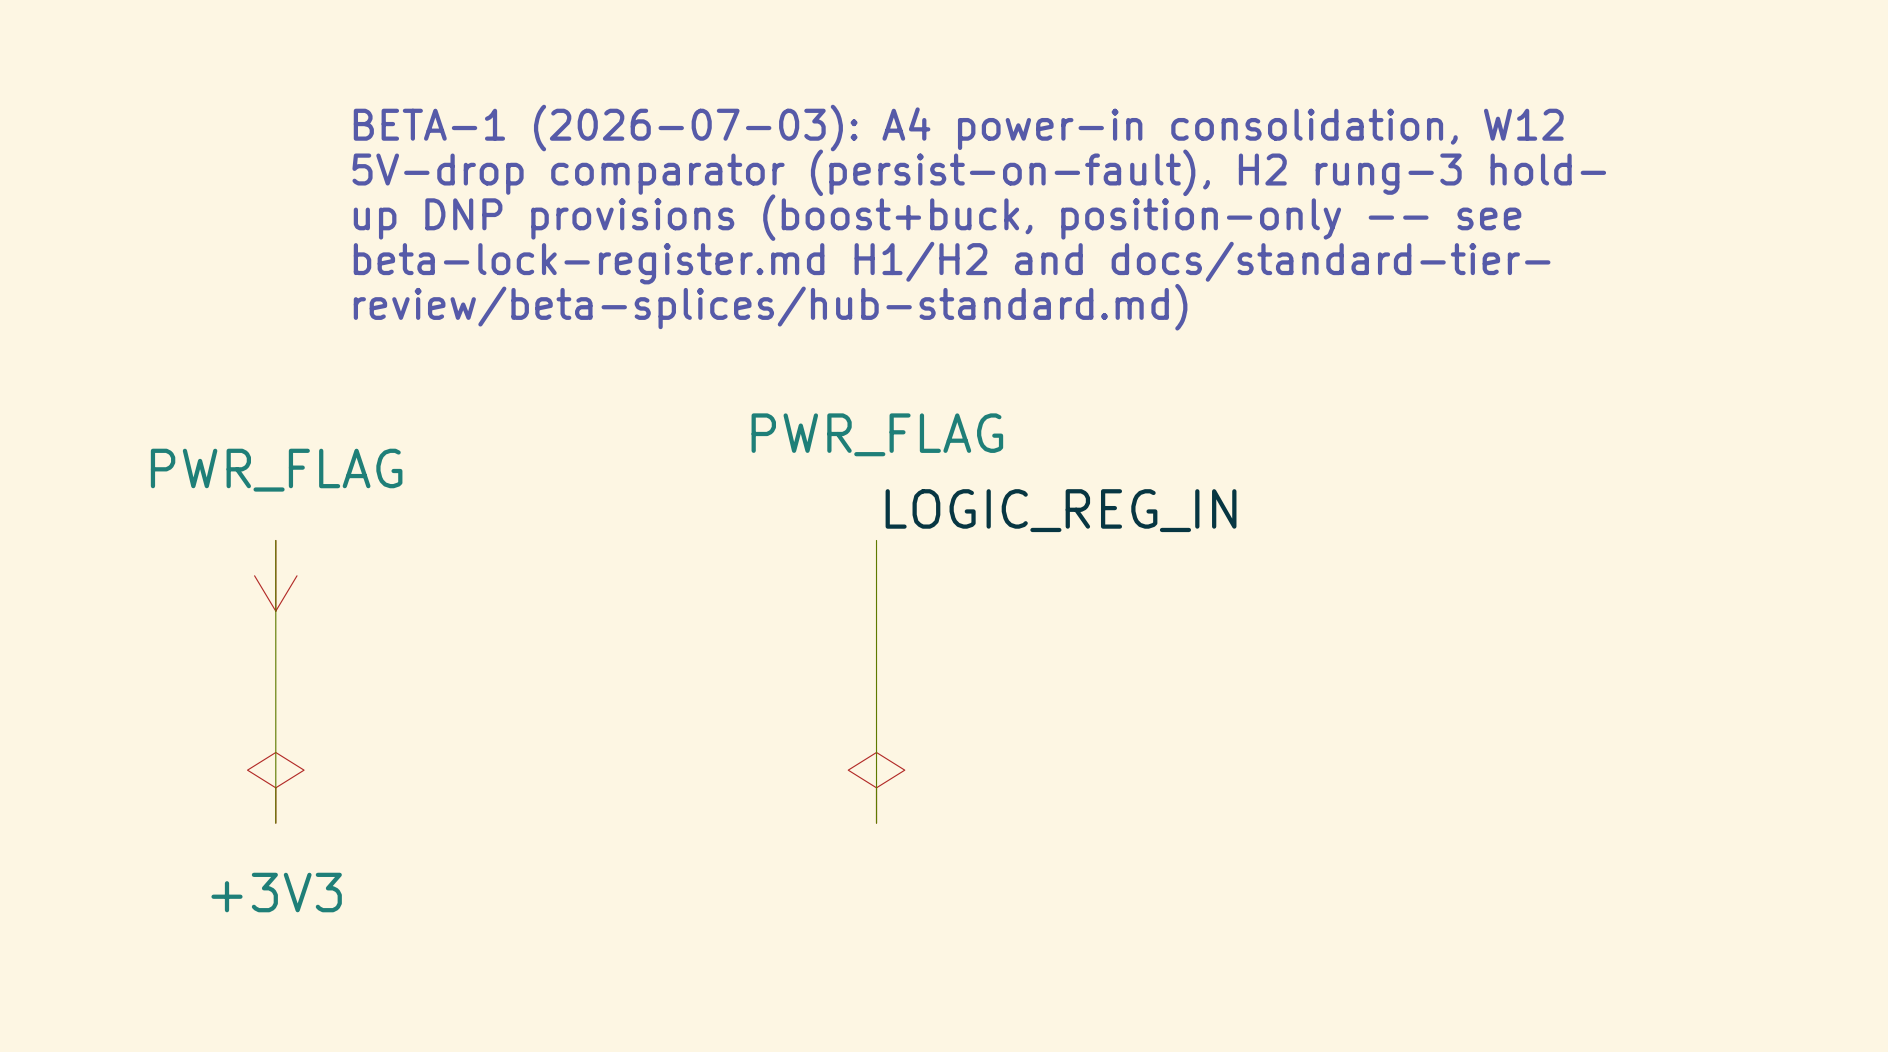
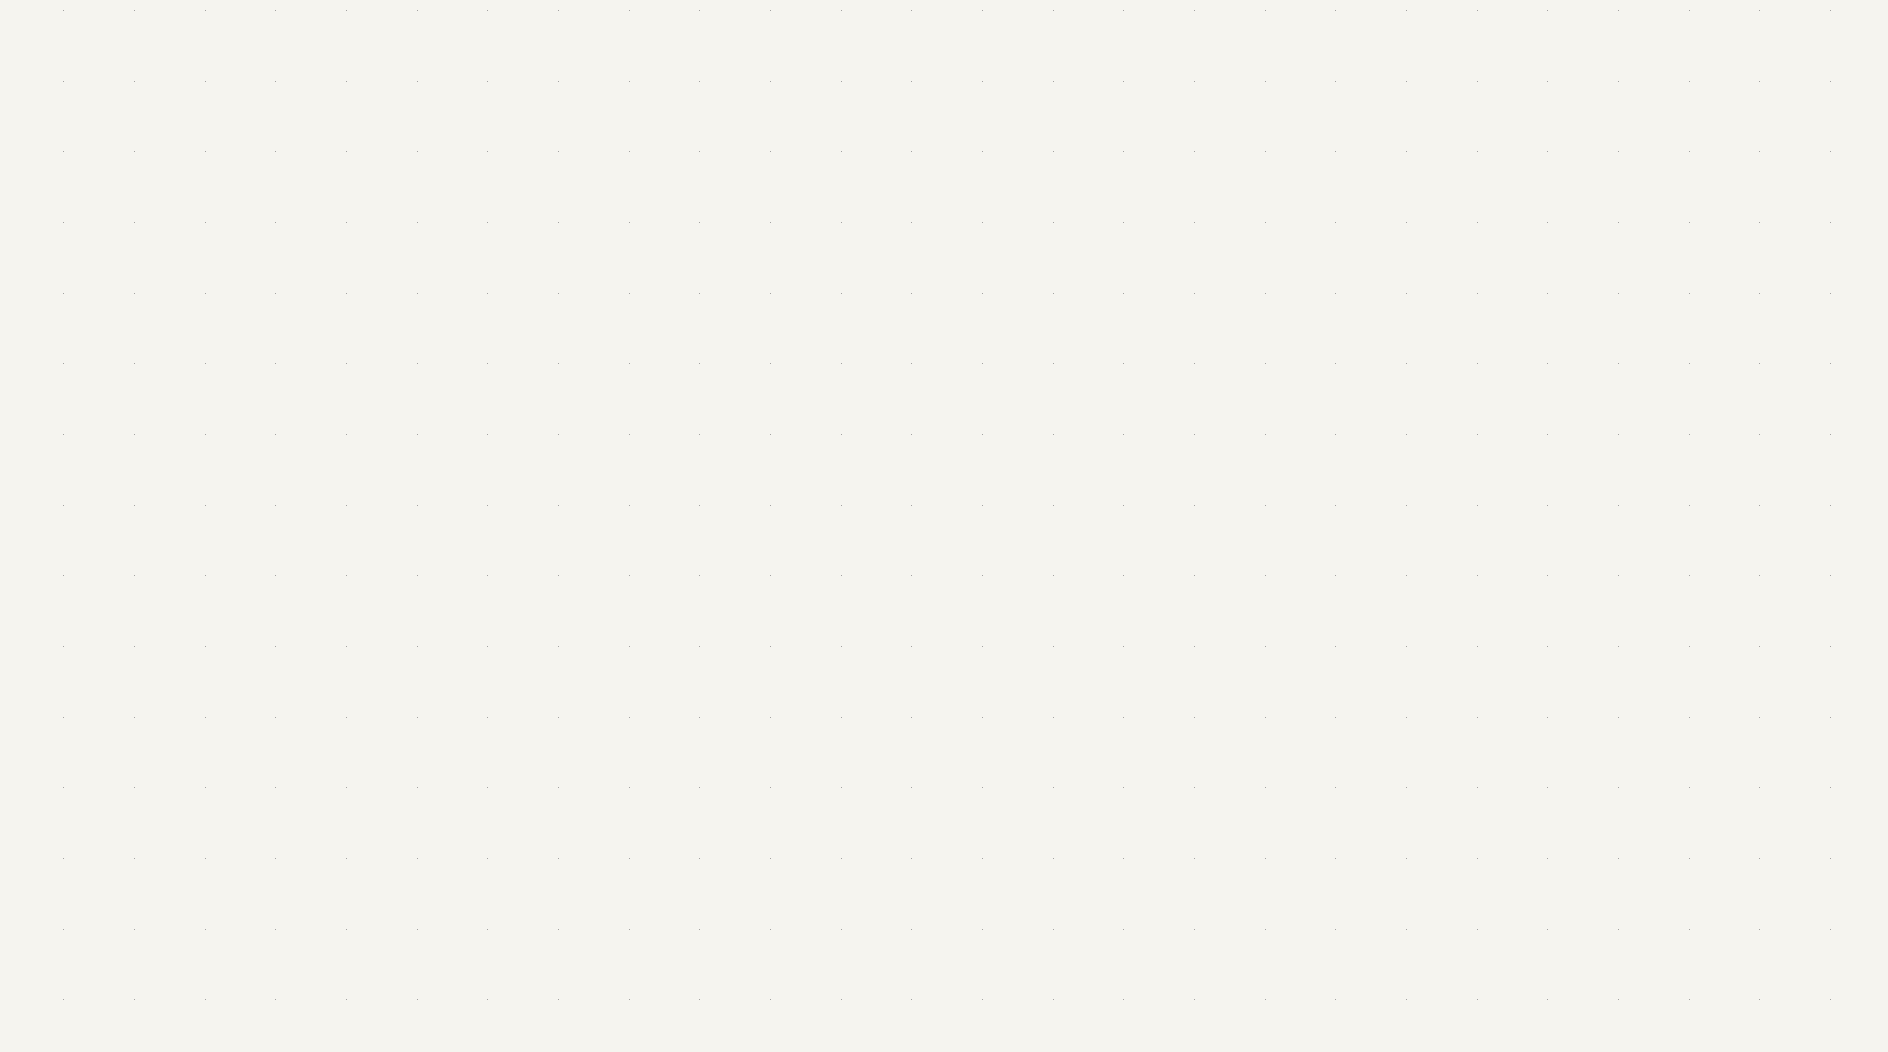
text: BETA-1 (2026-07-03): A4 power-in consolidation, W12 (958, 128) -> none
text: 5V-drop comparator (persist-on-fault), H2 rung-3 hold- (979, 172) -> none
text: up DNP provisions (boost+buck, position-only -- see (937, 217) -> none
text: beta-lock-register.md H1/H2 and docs/standard-tier- (952, 263) -> none
text: review/beta-splices/hub-standard.md) (770, 307) -> none
label: LOGIC_REG_IN (1061, 510) -> none
wire: (275, 540) (275, 823) -> none
wire: (876, 540) (876, 823) -> none
power symbol: +3V3 (275, 575) -> none
power symbol: PWR_FLAG (275, 787) -> none
power symbol: PWR_FLAG (876, 787) -> none

